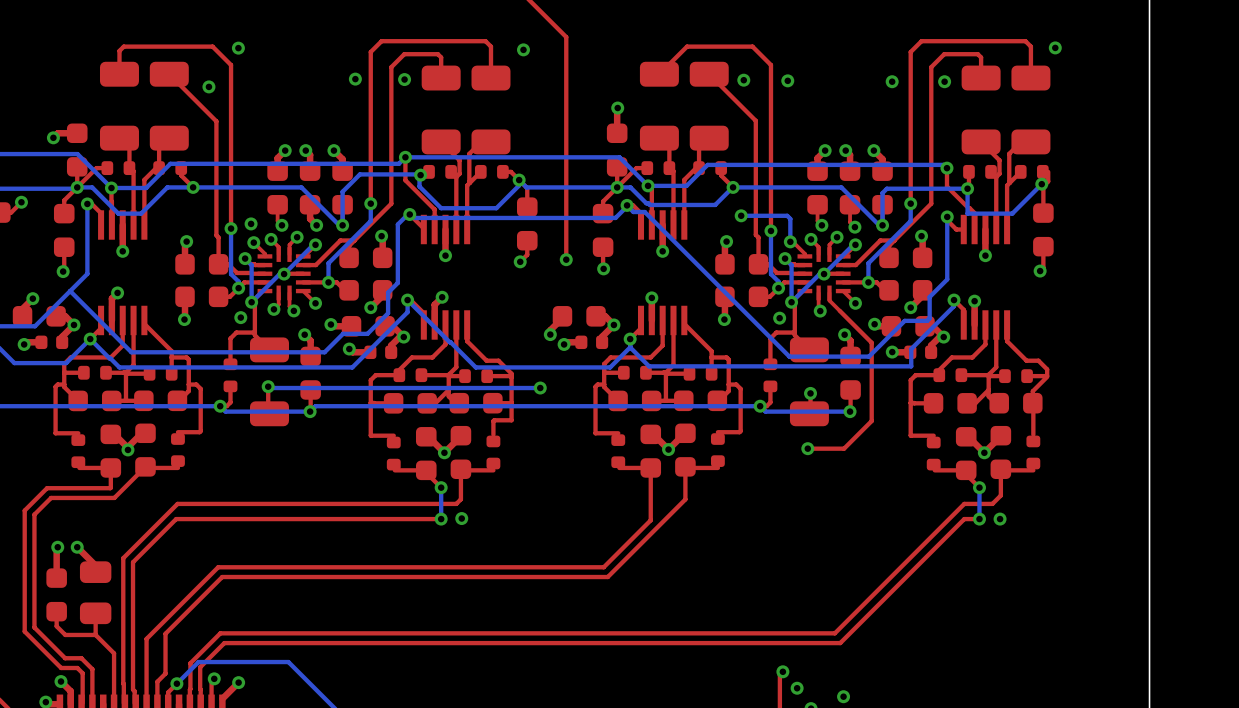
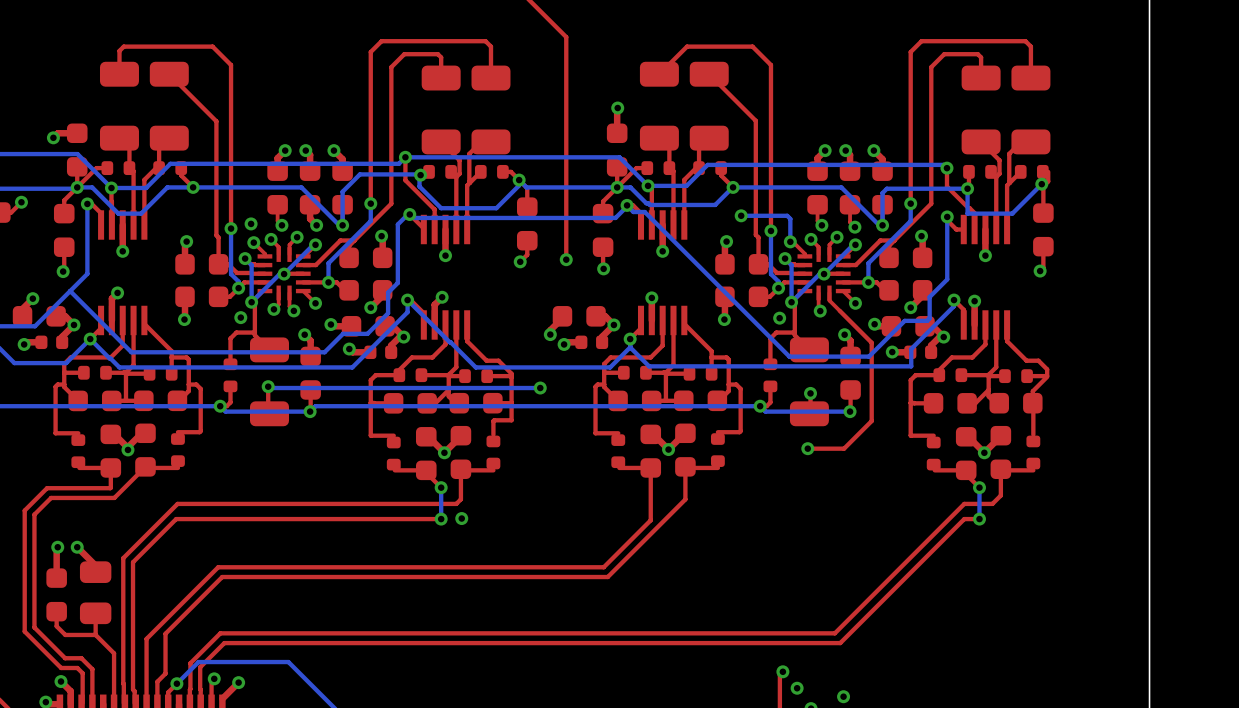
via: (1055, 47) -> none
via: (238, 48) -> none
via: (523, 49) -> none
via: (355, 79) -> none
via: (404, 79) -> none
via: (743, 80) -> none
via: (787, 80) -> none
via: (892, 81) -> none
via: (944, 81) -> none
via: (208, 86) -> none
via: (1000, 519) -> none

